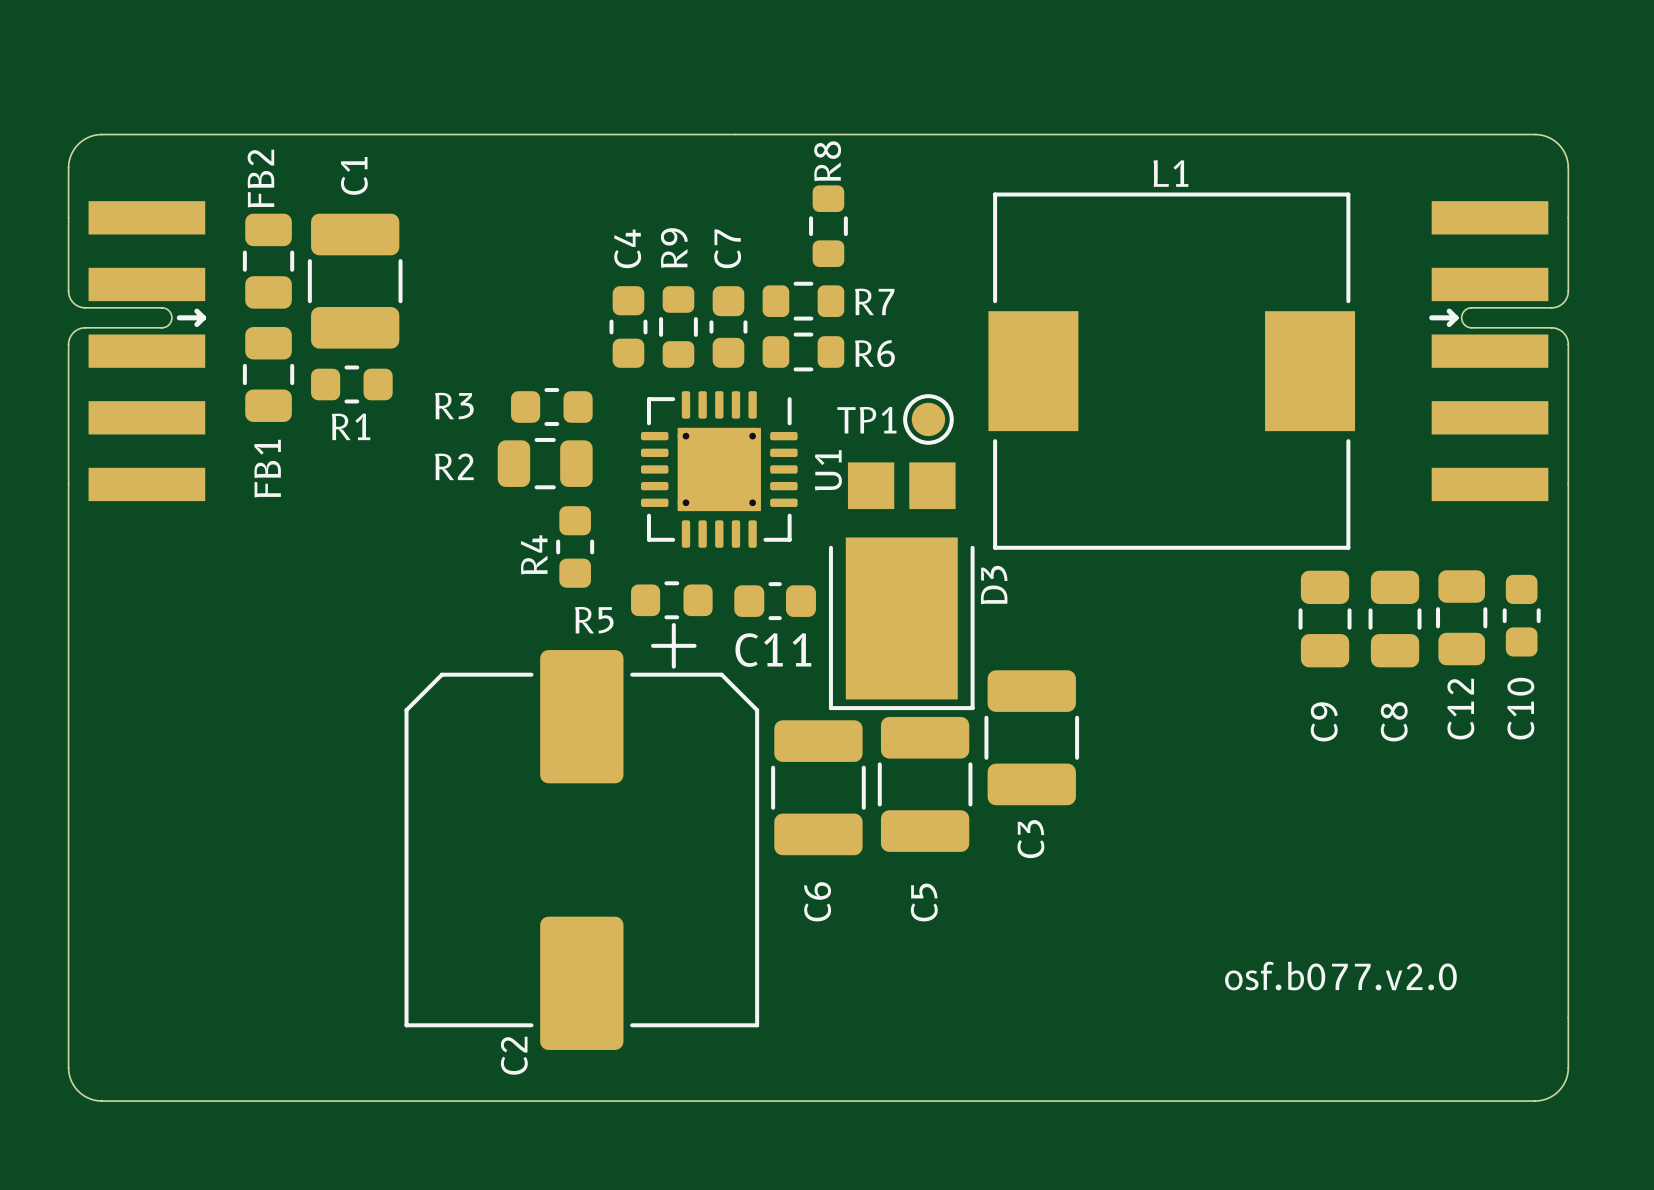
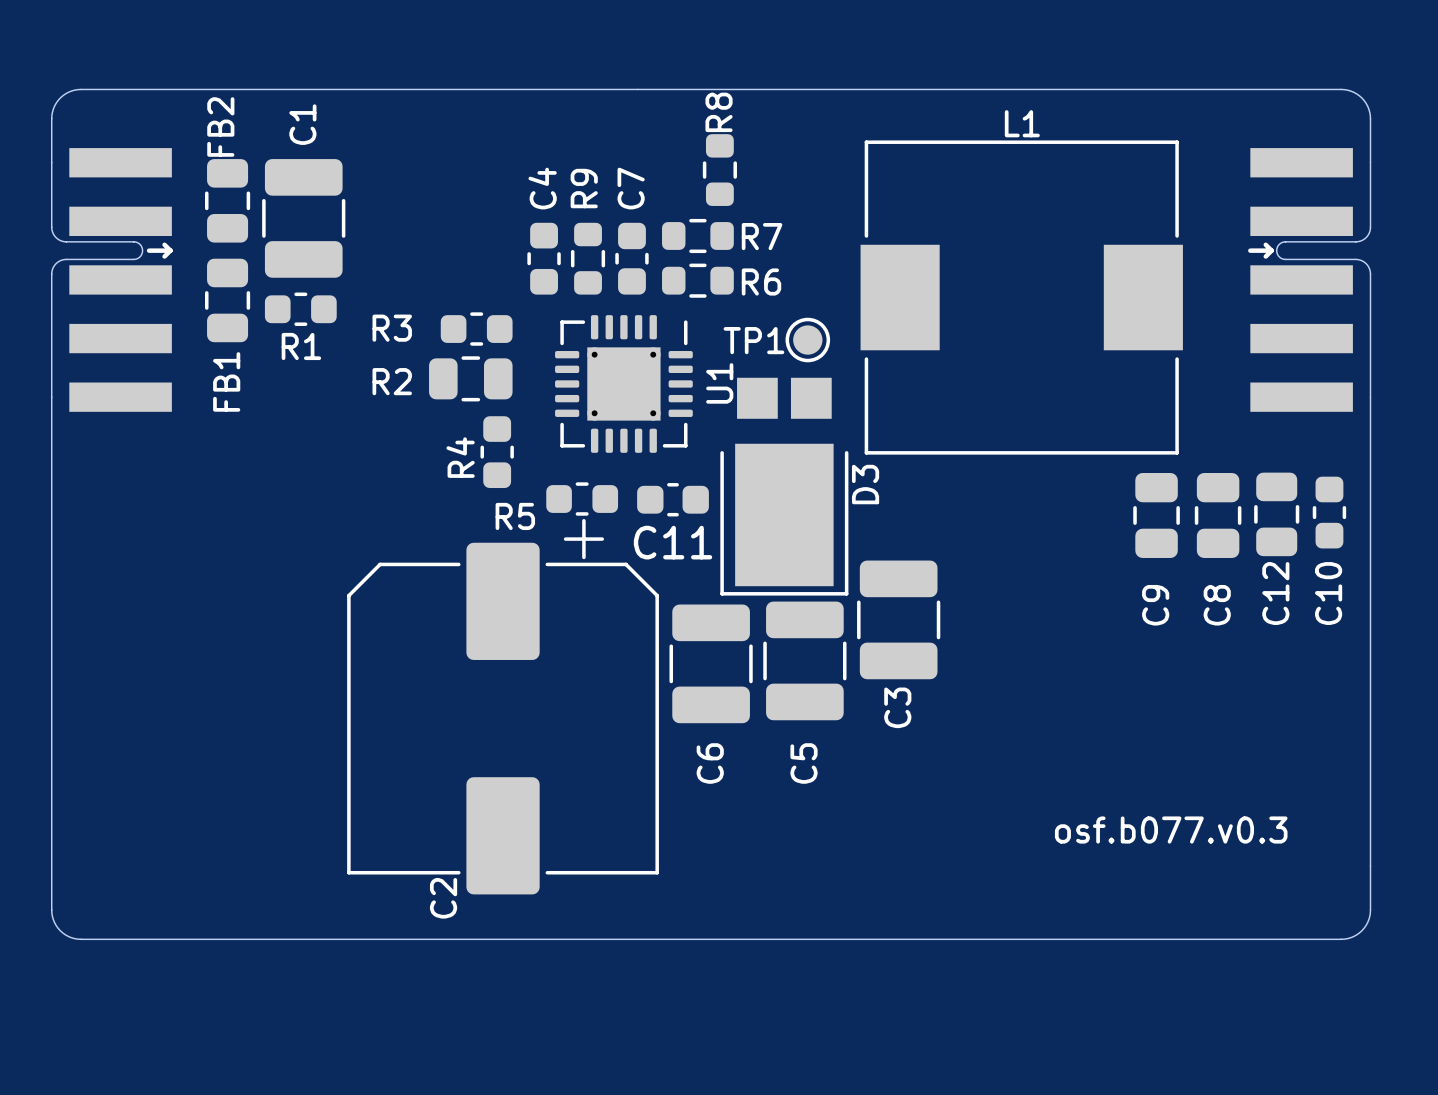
text: osf.b077.v2.0 (1340, 976) -> osf.b077.v0.3 (1171, 830)

